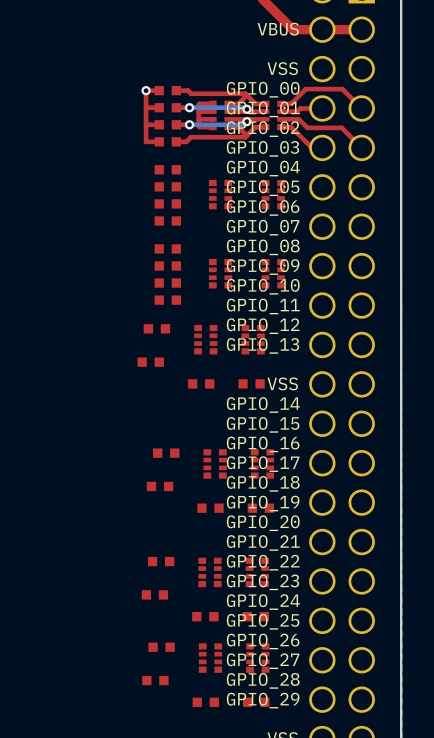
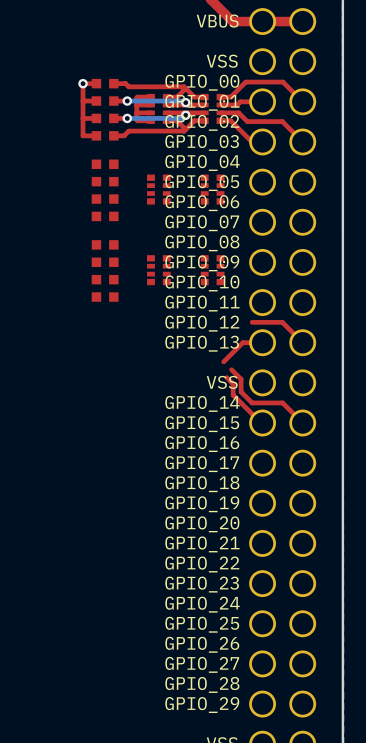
top track: none -> (252, 322) (282, 322) (302, 342)
part: (156, 328) -> none
part: (205, 339) -> none
part: (253, 339) -> none
top track: none -> (262, 342) (242, 342) (223, 361)
part: (150, 362) -> none
top track: none -> (231, 369) (241, 379) (241, 391) (252, 402) (282, 402) (302, 423)
top track: none -> (226, 377) (233, 383) (233, 395) (262, 423)
part: (201, 383) -> none
part: (251, 383) -> none
part: (166, 453) -> none
part: (215, 463) -> none
part: (262, 463) -> none
part: (160, 486) -> none
part: (210, 508) -> none
part: (260, 508) -> none
part: (161, 561) -> none
part: (210, 572) -> none
part: (257, 572) -> none
part: (154, 594) -> none
part: (205, 616) -> none
part: (255, 616) -> none
part: (161, 647) -> none
part: (210, 658) -> none
part: (257, 658) -> none
part: (155, 680) -> none
part: (205, 702) -> none
part: (256, 702) -> none

